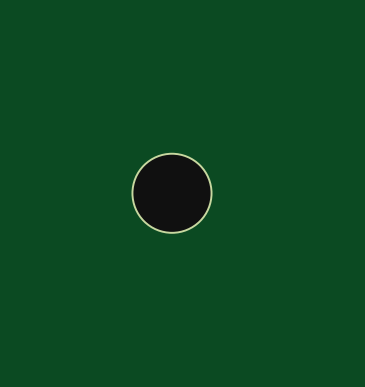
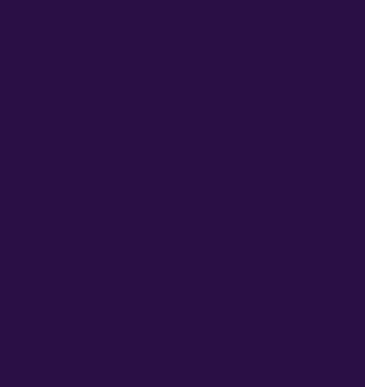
part: (171, 193) -> none

